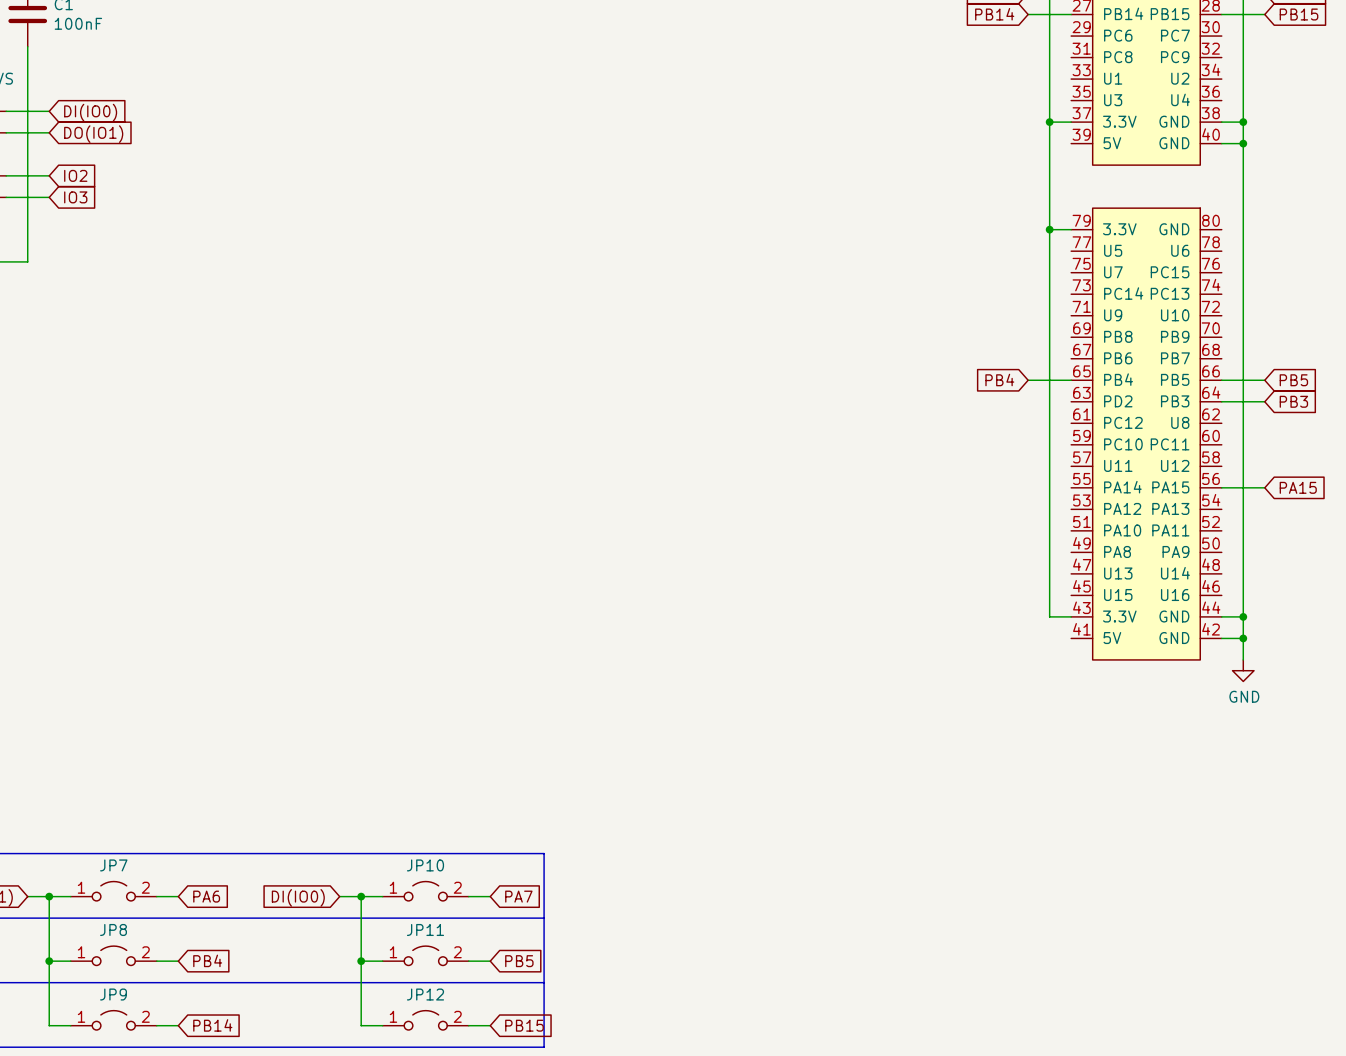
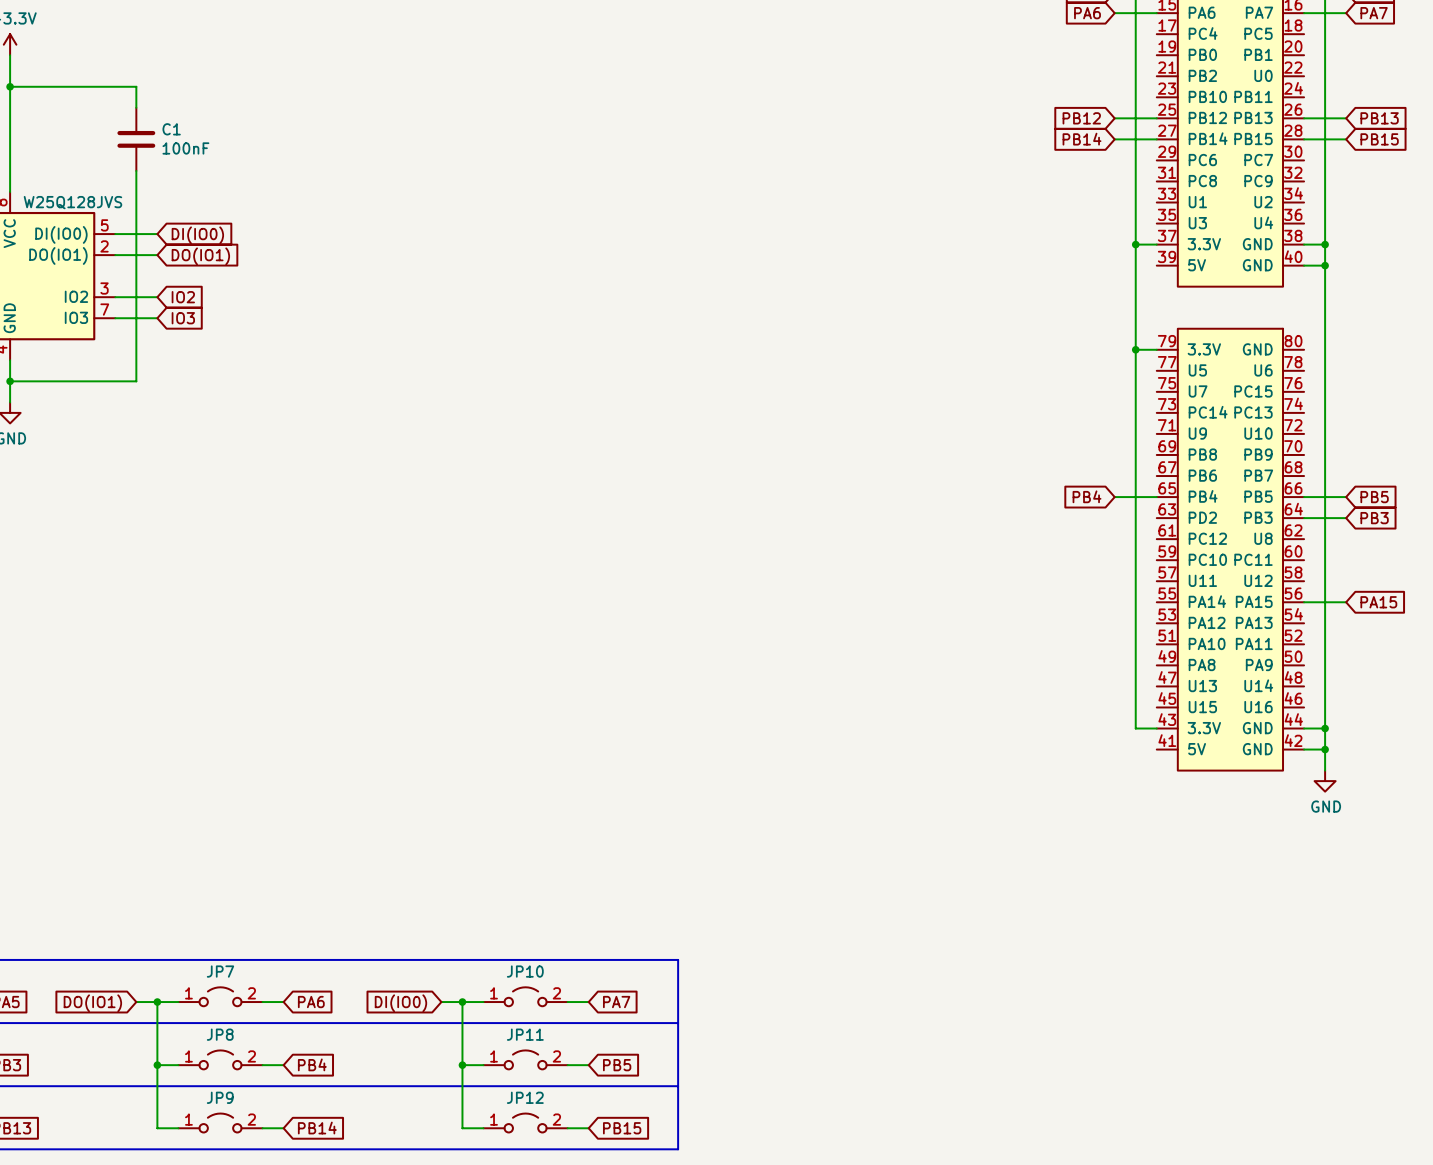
line: (544, 853) (544, 1047) -> (641, 959) (678, 959) (678, 1149) (641, 1149)
line: none -> (641, 1023) (678, 1023)
line: none -> (641, 1086) (678, 1086)

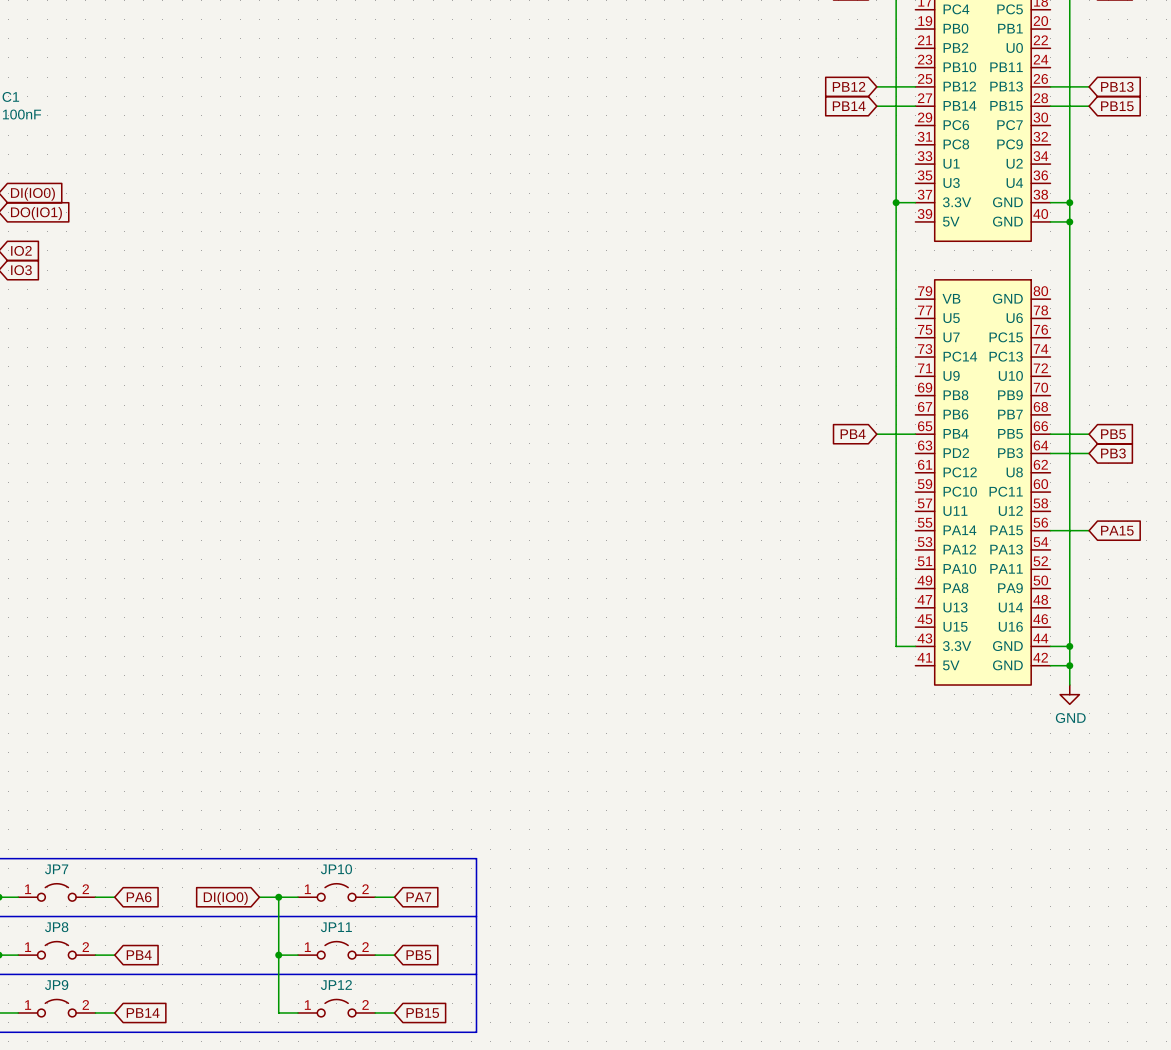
wire: (1135, 349) (1156, 349) -> none
junction: (1135, 349) -> none
part pin name: 3.3V (1204, 349) -> VB (951, 298)

